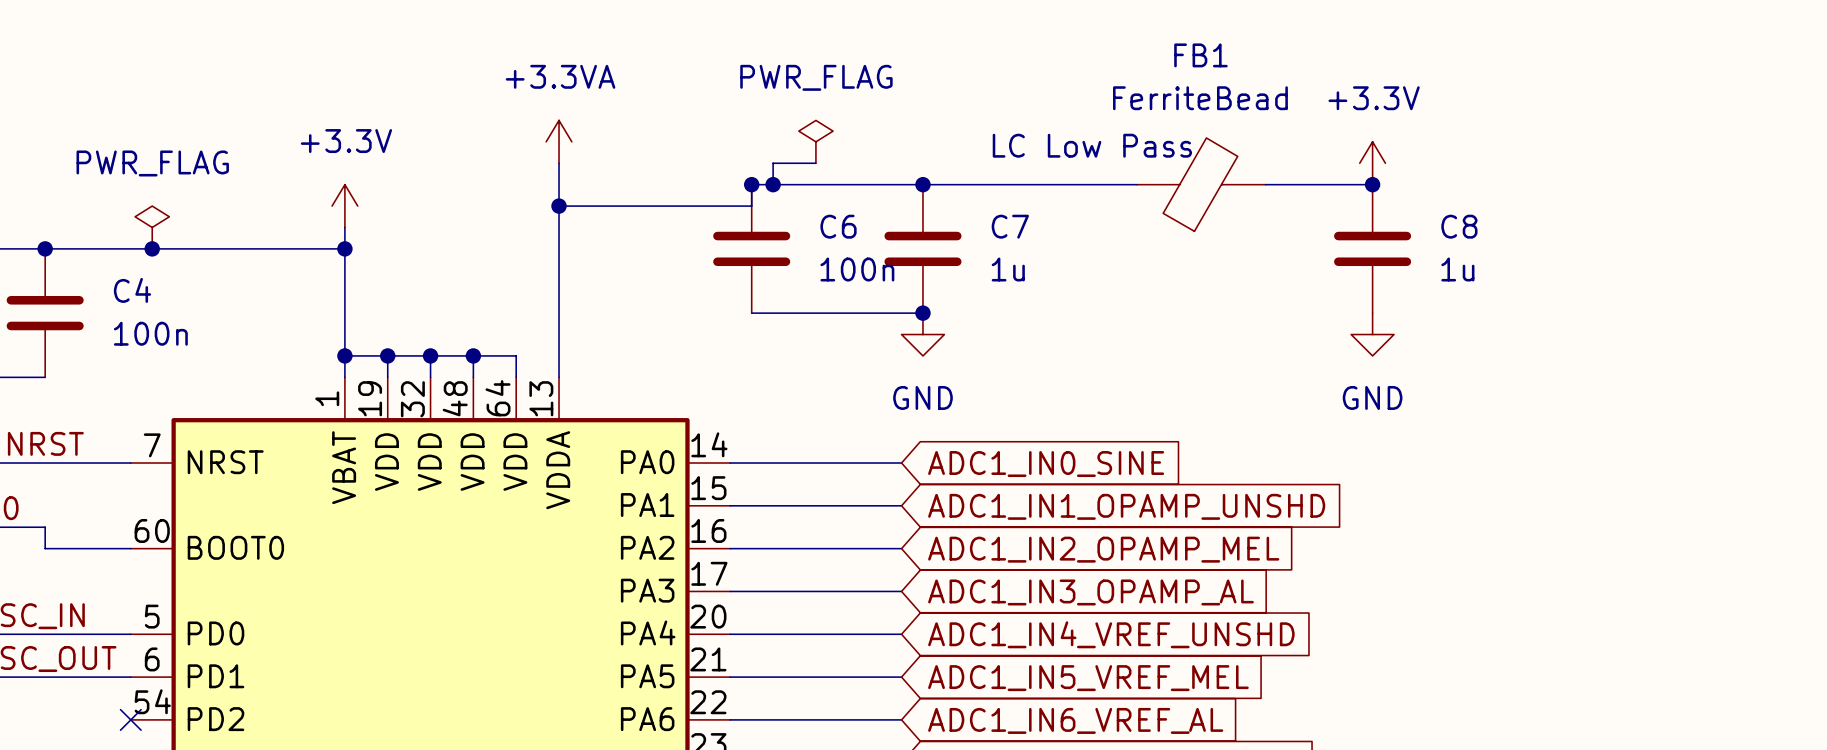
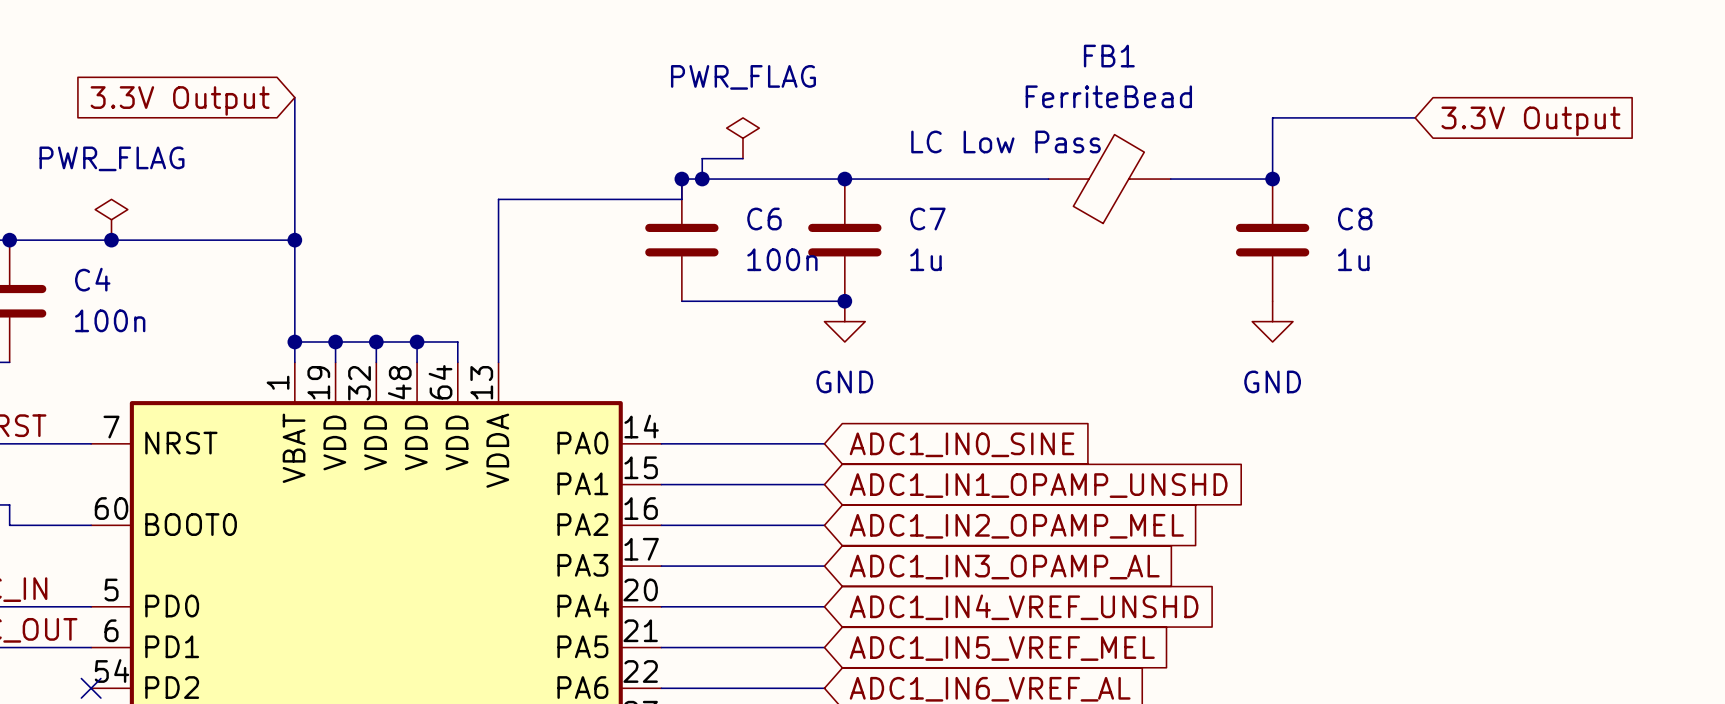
wire: none -> (294, 97) (294, 219)
global label: none -> 3.3V Output (180, 100)
wire: none -> (1415, 117) (1272, 117) (1272, 179)
global label: none -> 3.3V Output (1530, 121)
power symbol: +3.3VA (559, 141) -> none
wire: (559, 163) (559, 206) -> none
power symbol: +3.3V (1372, 163) -> none
power symbol: +3.3V (344, 206) -> none
junction: (559, 206) -> none

